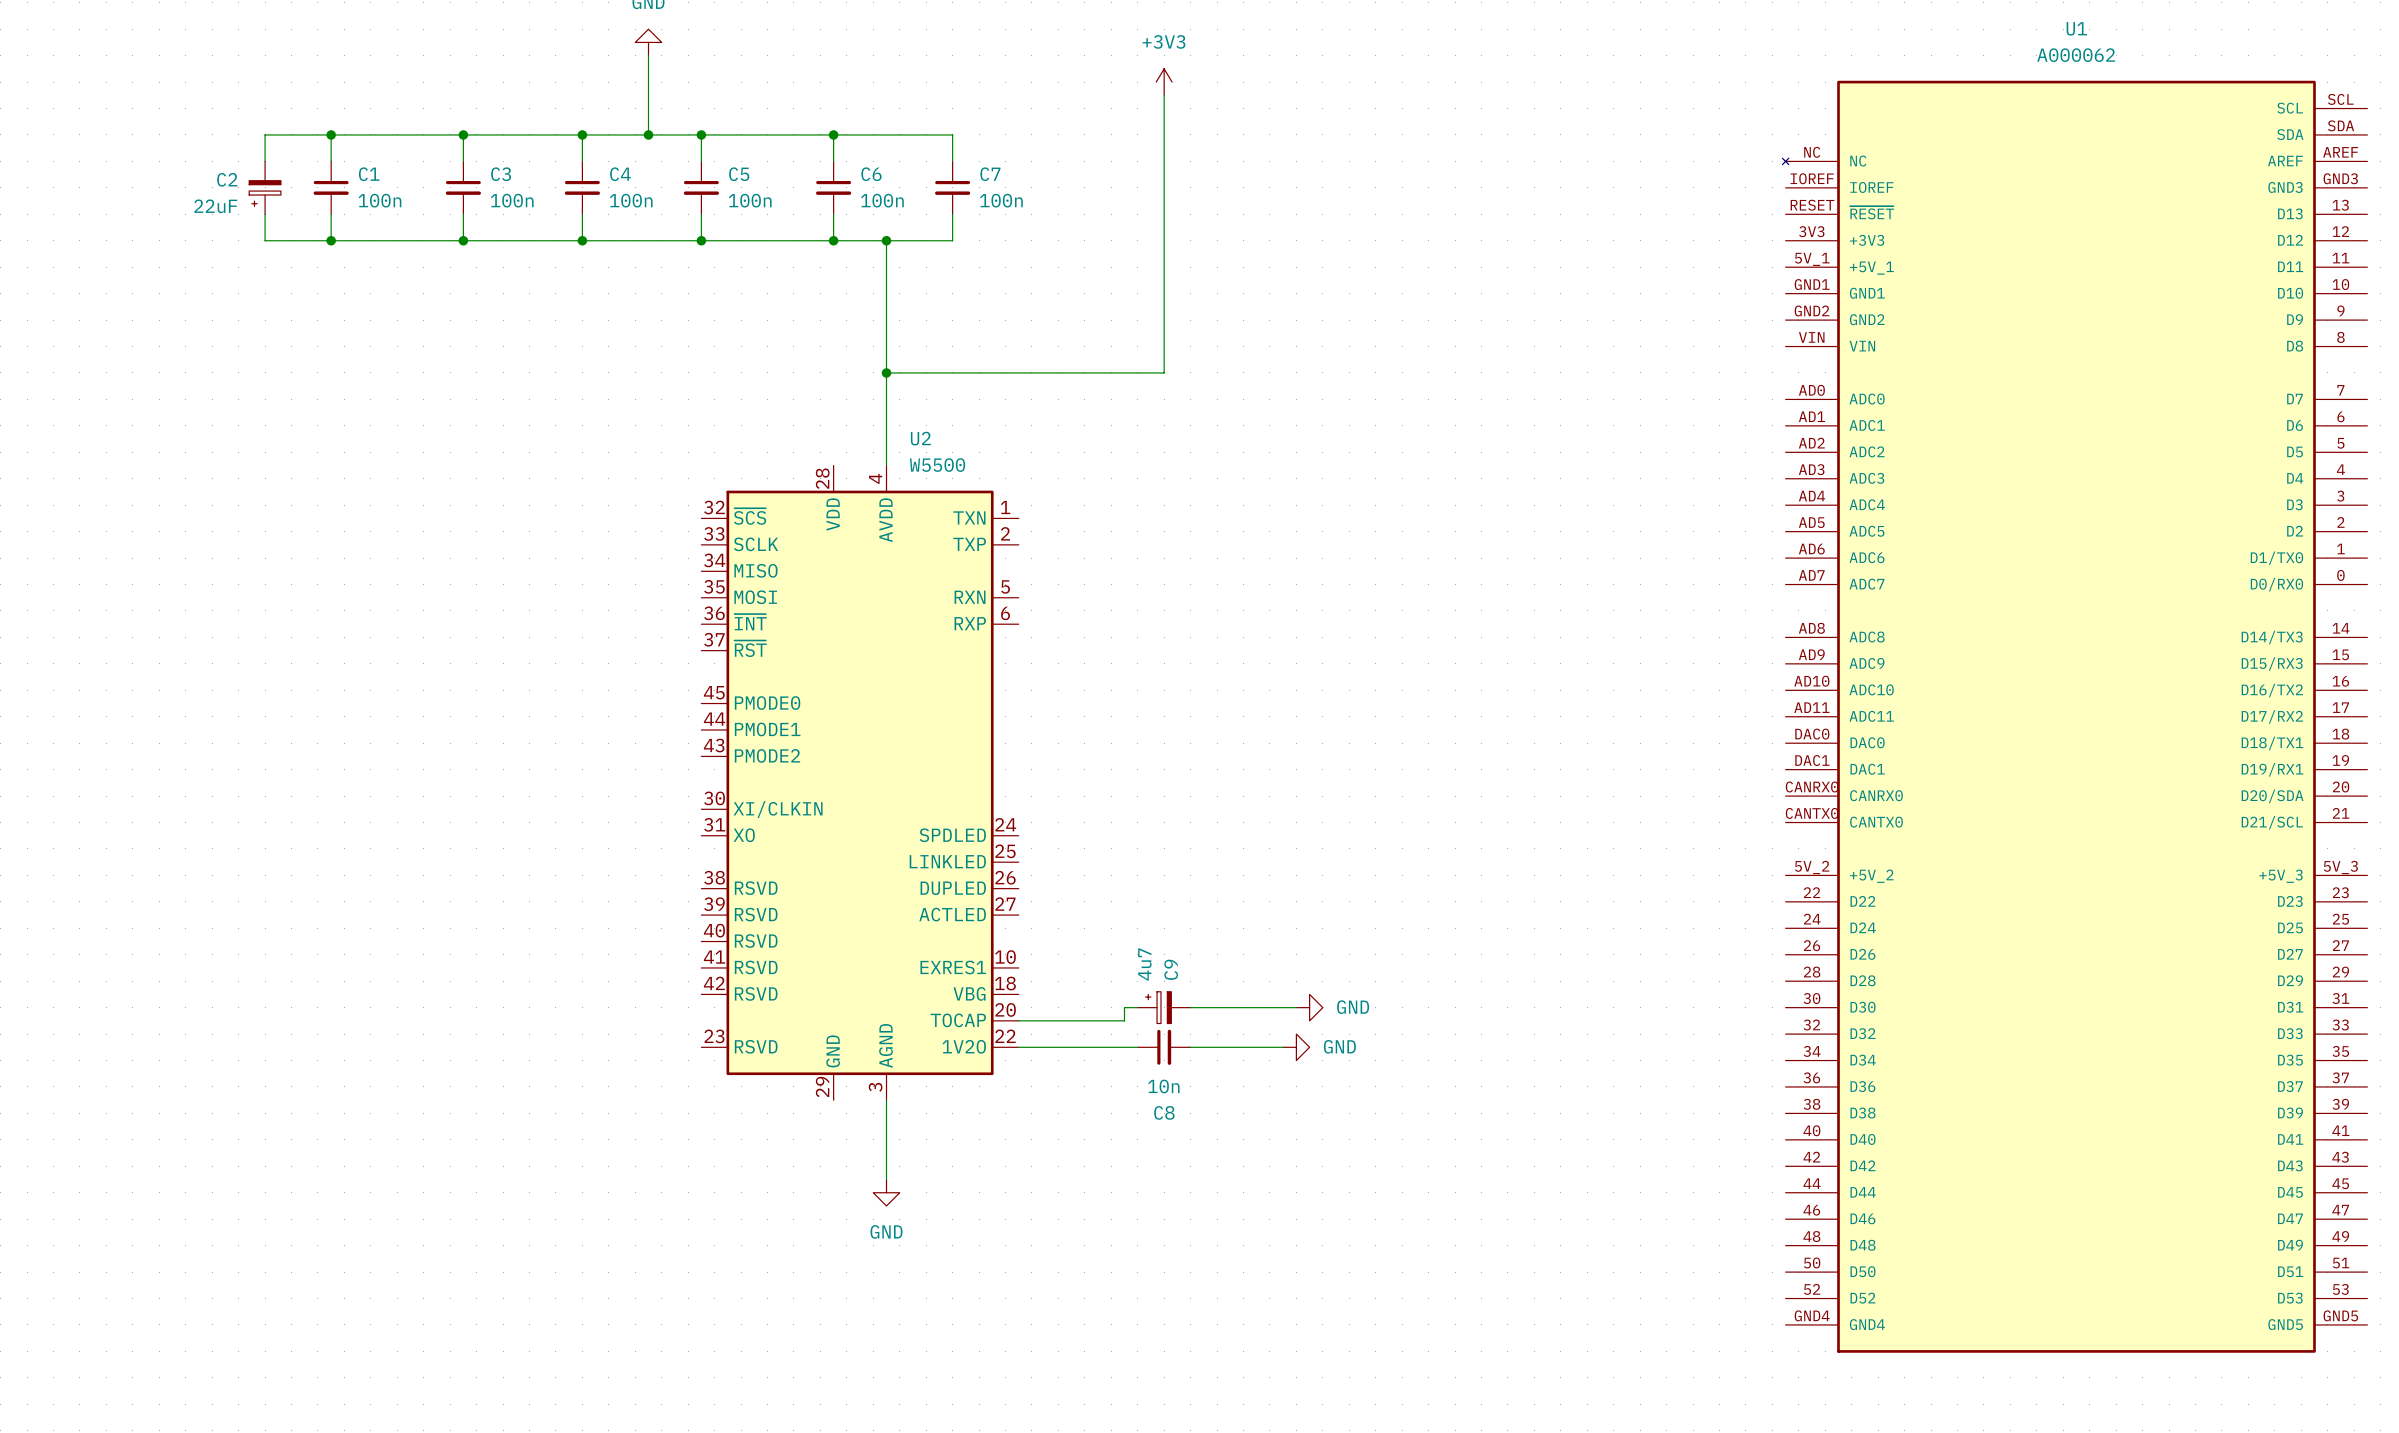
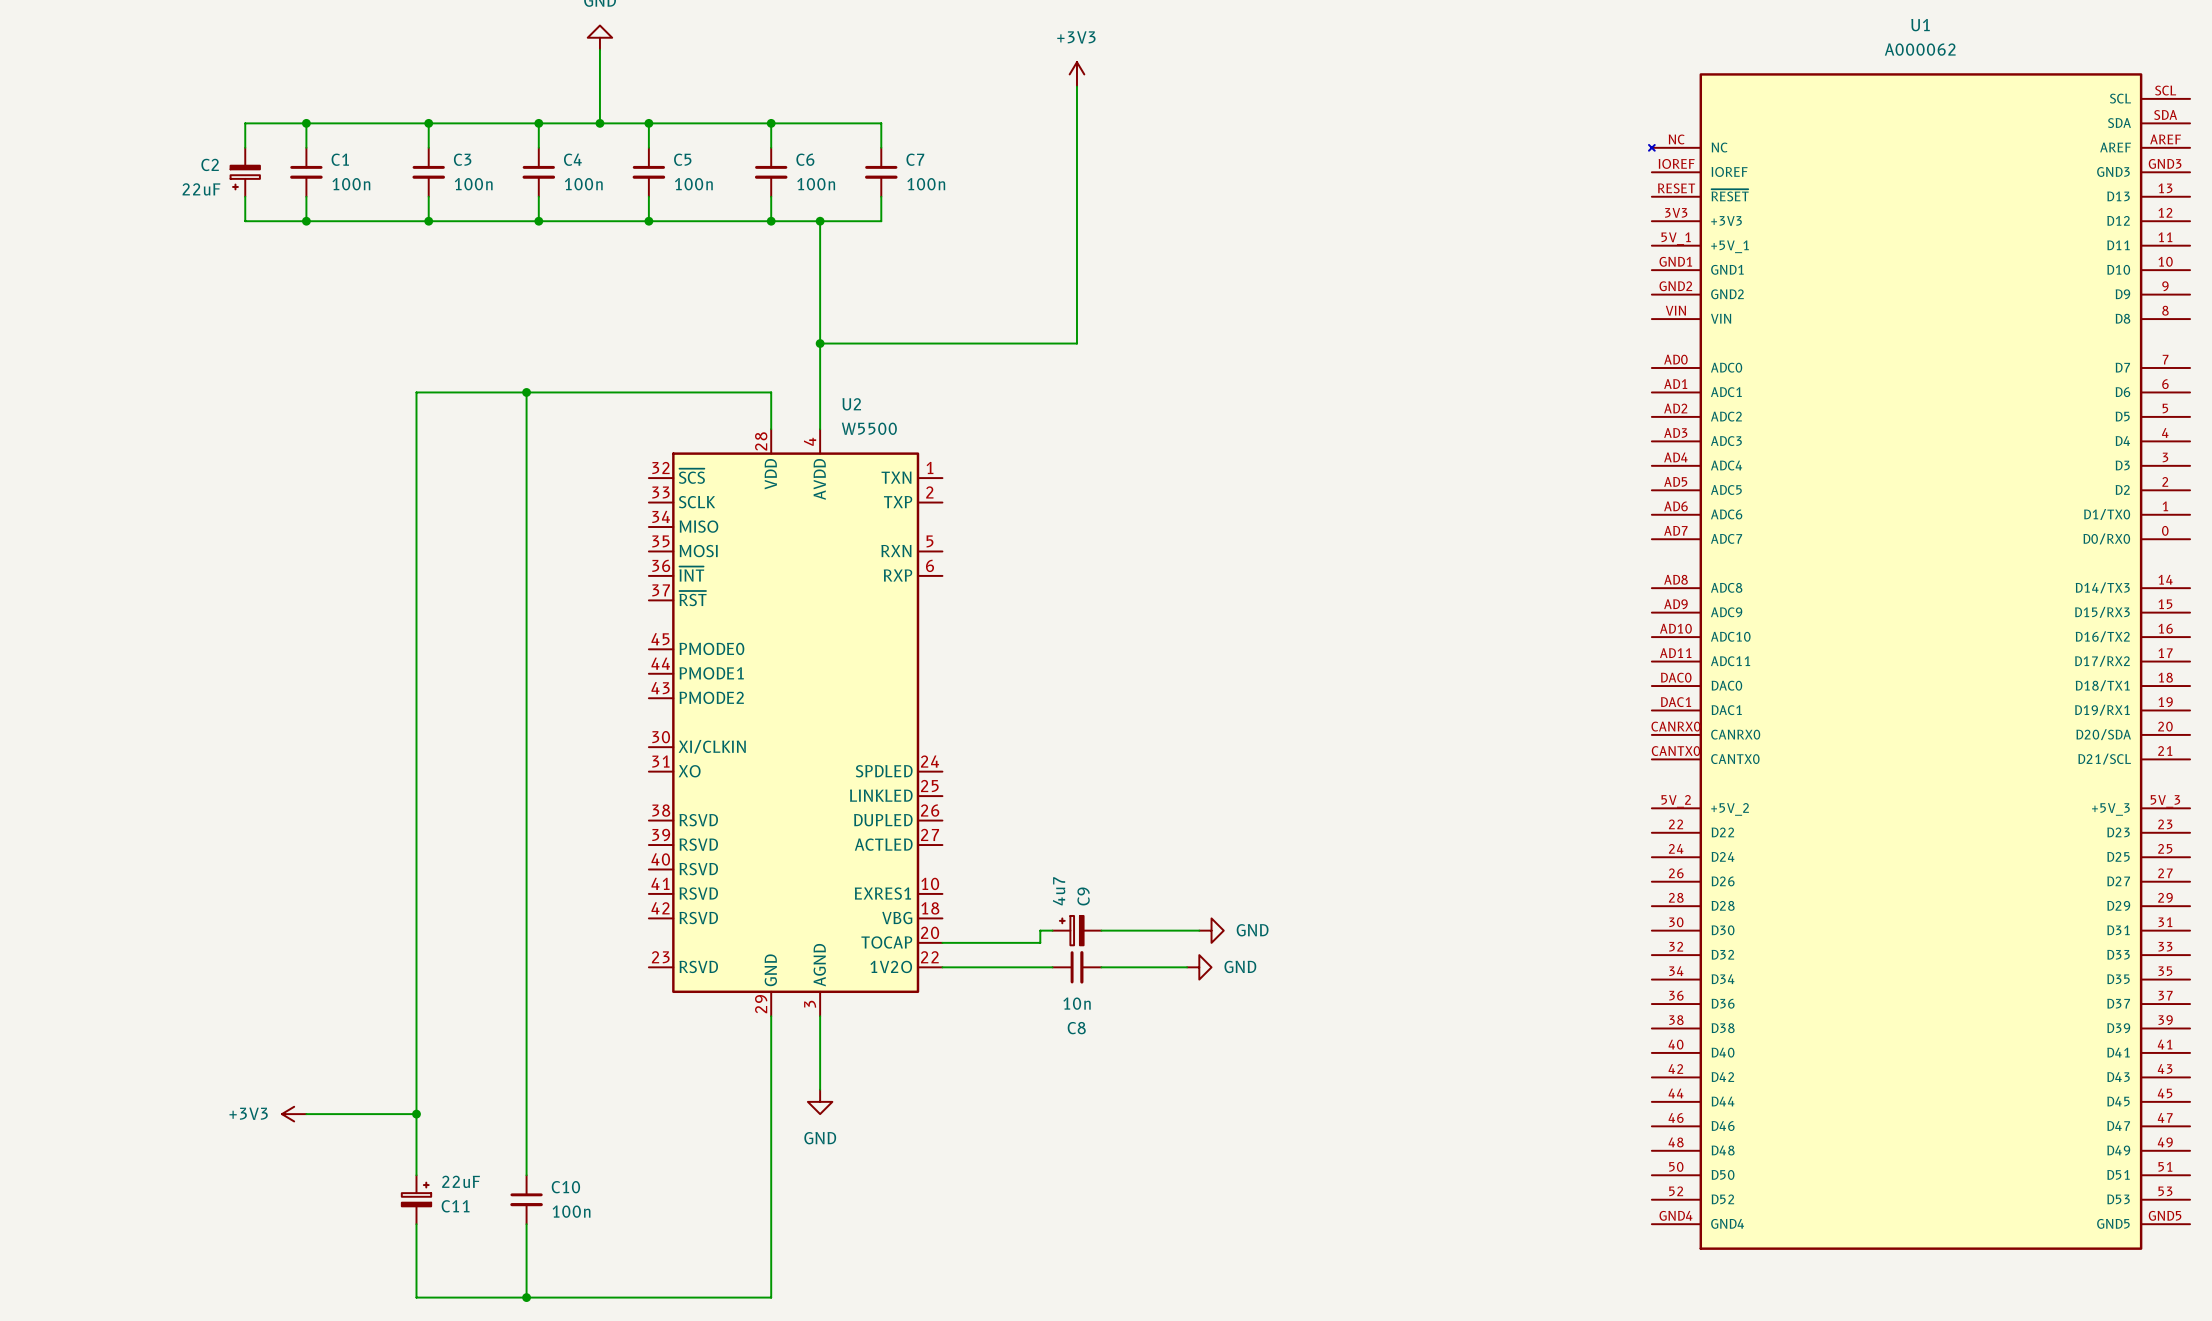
wire: none -> (526, 392) (526, 1175)
junction: none -> (526, 392)
wire: none -> (771, 429) (771, 392) (416, 392) (416, 1175)
wire: none -> (771, 1016) (771, 1297) (416, 1297) (416, 1224)
power symbol: none -> +3V3 (294, 1114)
wire: none -> (306, 1114) (416, 1114)
junction: none -> (416, 1114)
C11: none -> 22uF (416, 1199)
C10: none -> 100n (526, 1199)
wire: none -> (526, 1224) (526, 1297)
junction: none -> (526, 1297)

